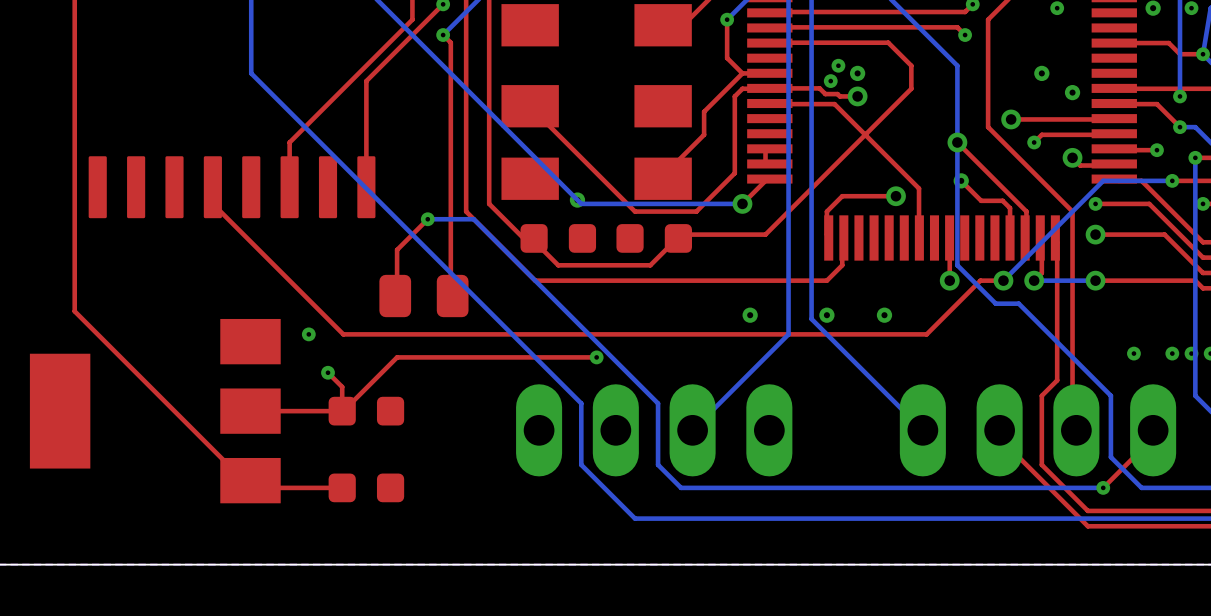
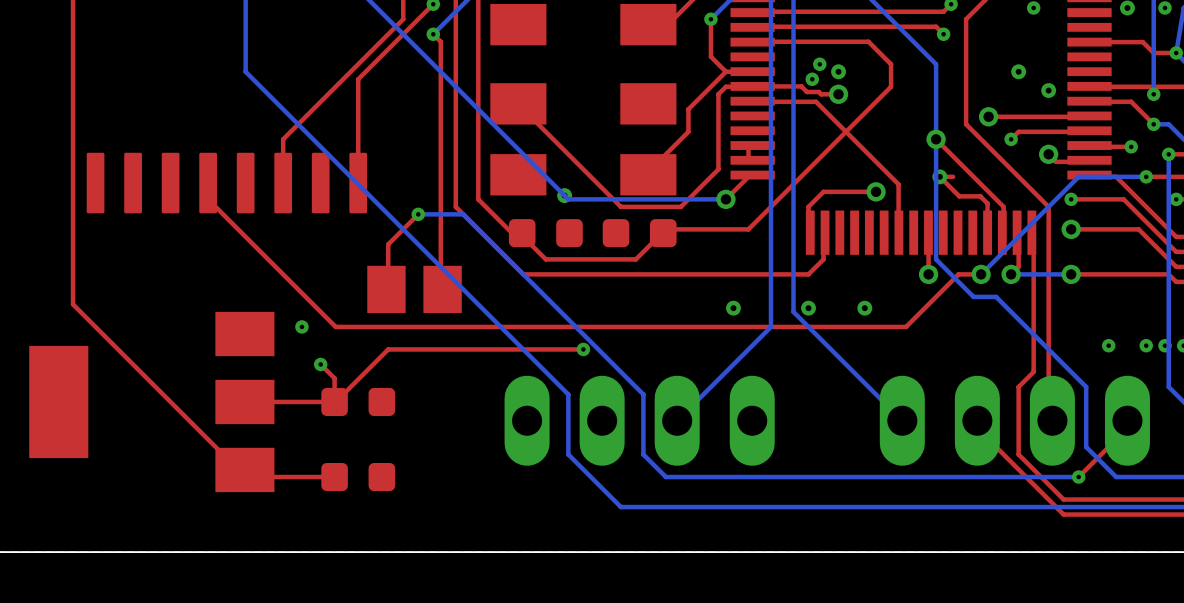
top track: none -> (953, 176) (939, 176)
part footprint: [379, 274, 469, 318] -> [367, 265, 462, 314]

